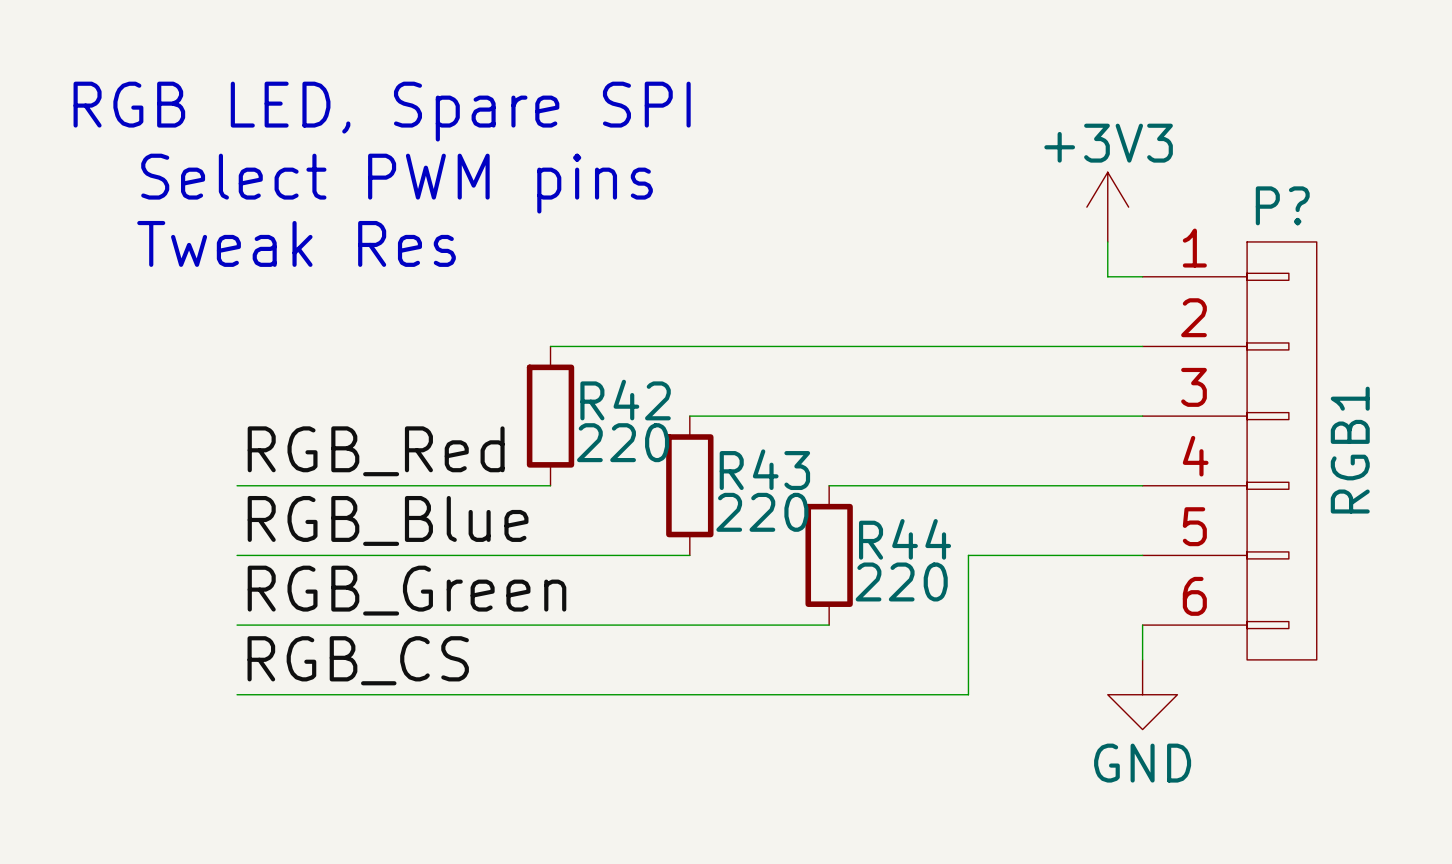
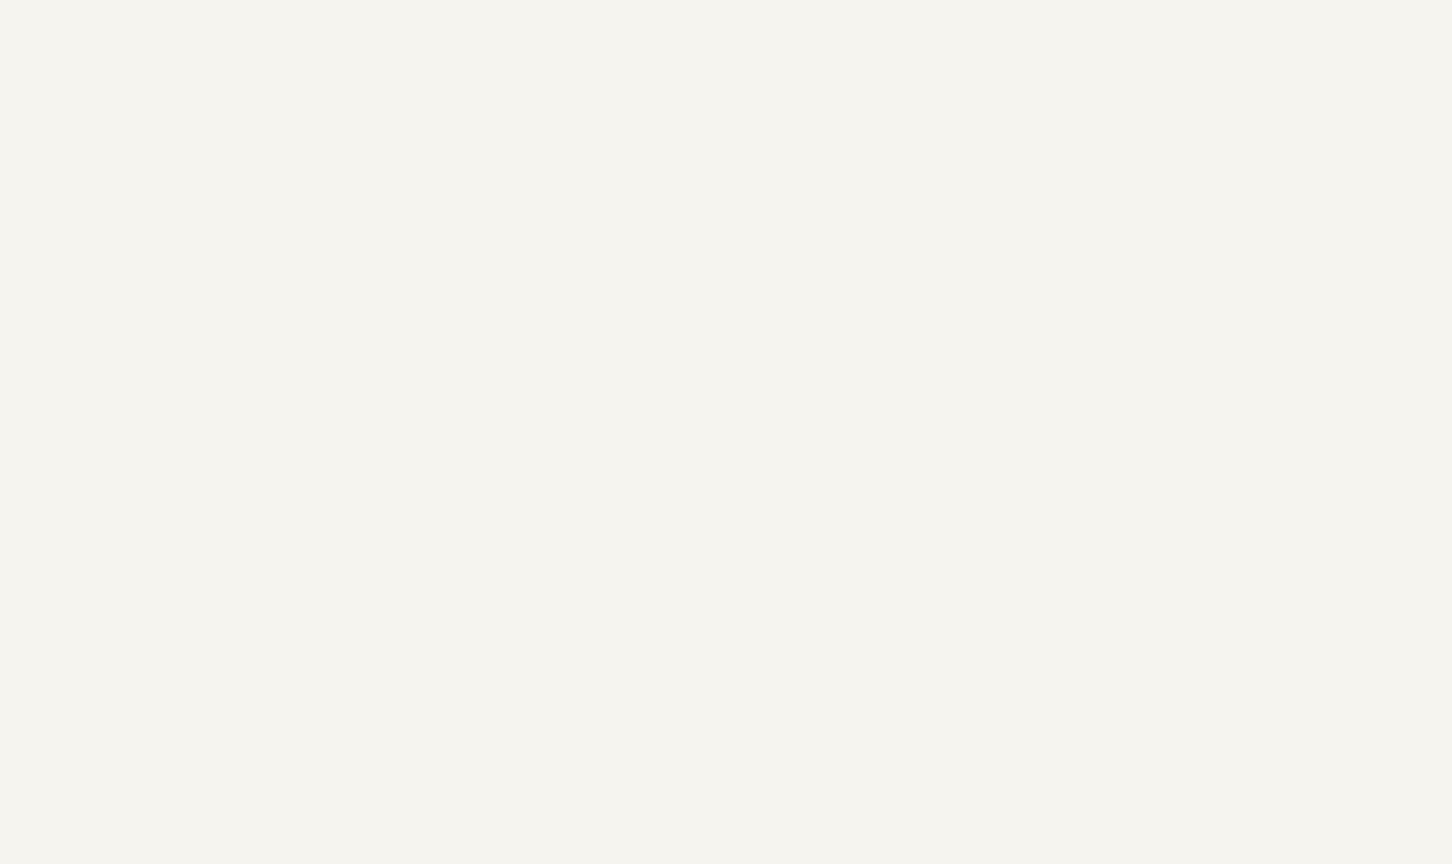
text: RGB LED, Spare SPI (382, 111) -> none
text: Select PWM pins (397, 183) -> none
power symbol: +3V3 (1107, 207) -> none
wire: (1107, 241) (1107, 276) (1142, 276) -> none
text: Tweak Res (296, 243) -> none
wire: (550, 346) (1142, 346) -> none
R42: 220 (550, 416) -> none
wire: (689, 416) (1142, 416) -> none
P?: RGB1 (1229, 450) -> none
label: RGB_Red (376, 451) -> none
wire: (237, 485) (550, 485) -> none
R43: 220 (689, 485) -> none
wire: (829, 485) (1142, 485) -> none
label: RGB_Blue (388, 520) -> none
wire: (237, 555) (689, 555) -> none
R44: 220 (829, 555) -> none
wire: (1142, 555) (968, 555) (968, 694) (237, 694) -> none
label: RGB_Green (406, 590) -> none
wire: (237, 625) (829, 625) -> none
wire: (1142, 625) (1142, 659) -> none
label: RGB_CS (358, 660) -> none
power symbol: GND (1142, 694) -> none

